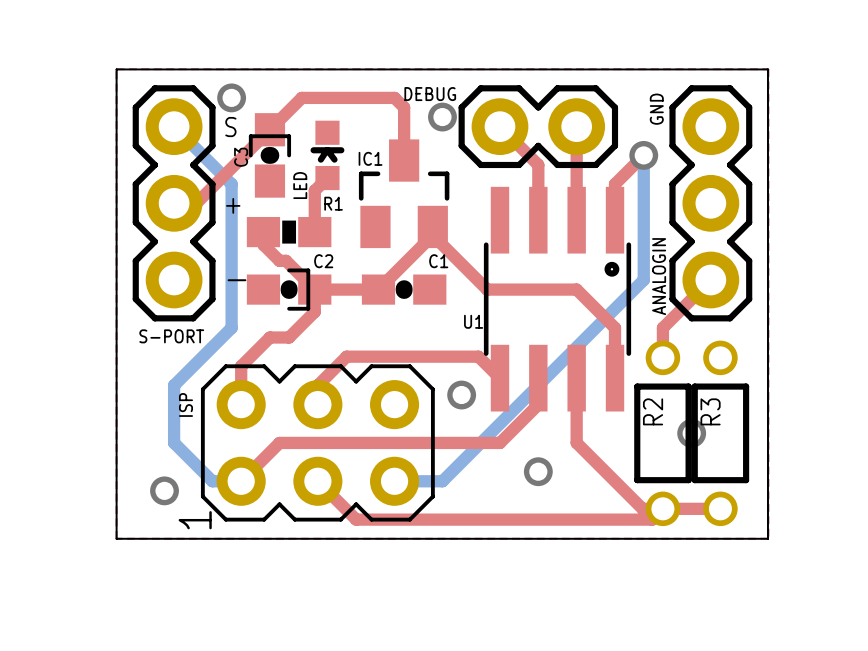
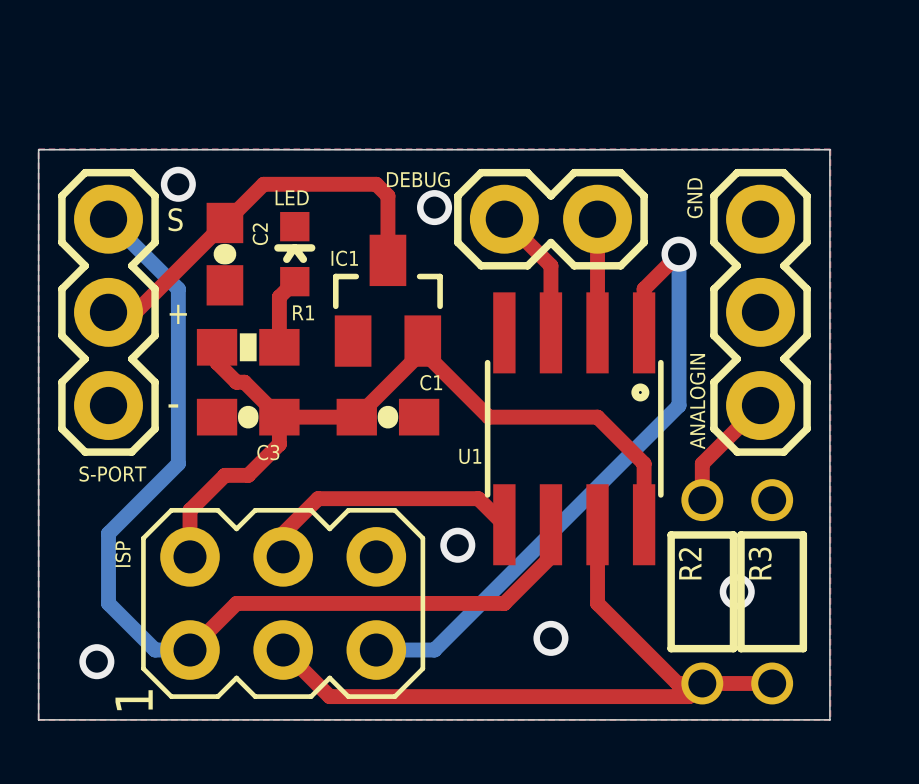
C3 footprint: [248, 113, 292, 198] -> [196, 398, 300, 436]
LED name rotation: 0° (300, 185) -> 90° clockwise (292, 197)
LED name position: LED (300, 185) -> LED (292, 197)
C2 footprint: [246, 268, 332, 311] -> [206, 202, 244, 306]

